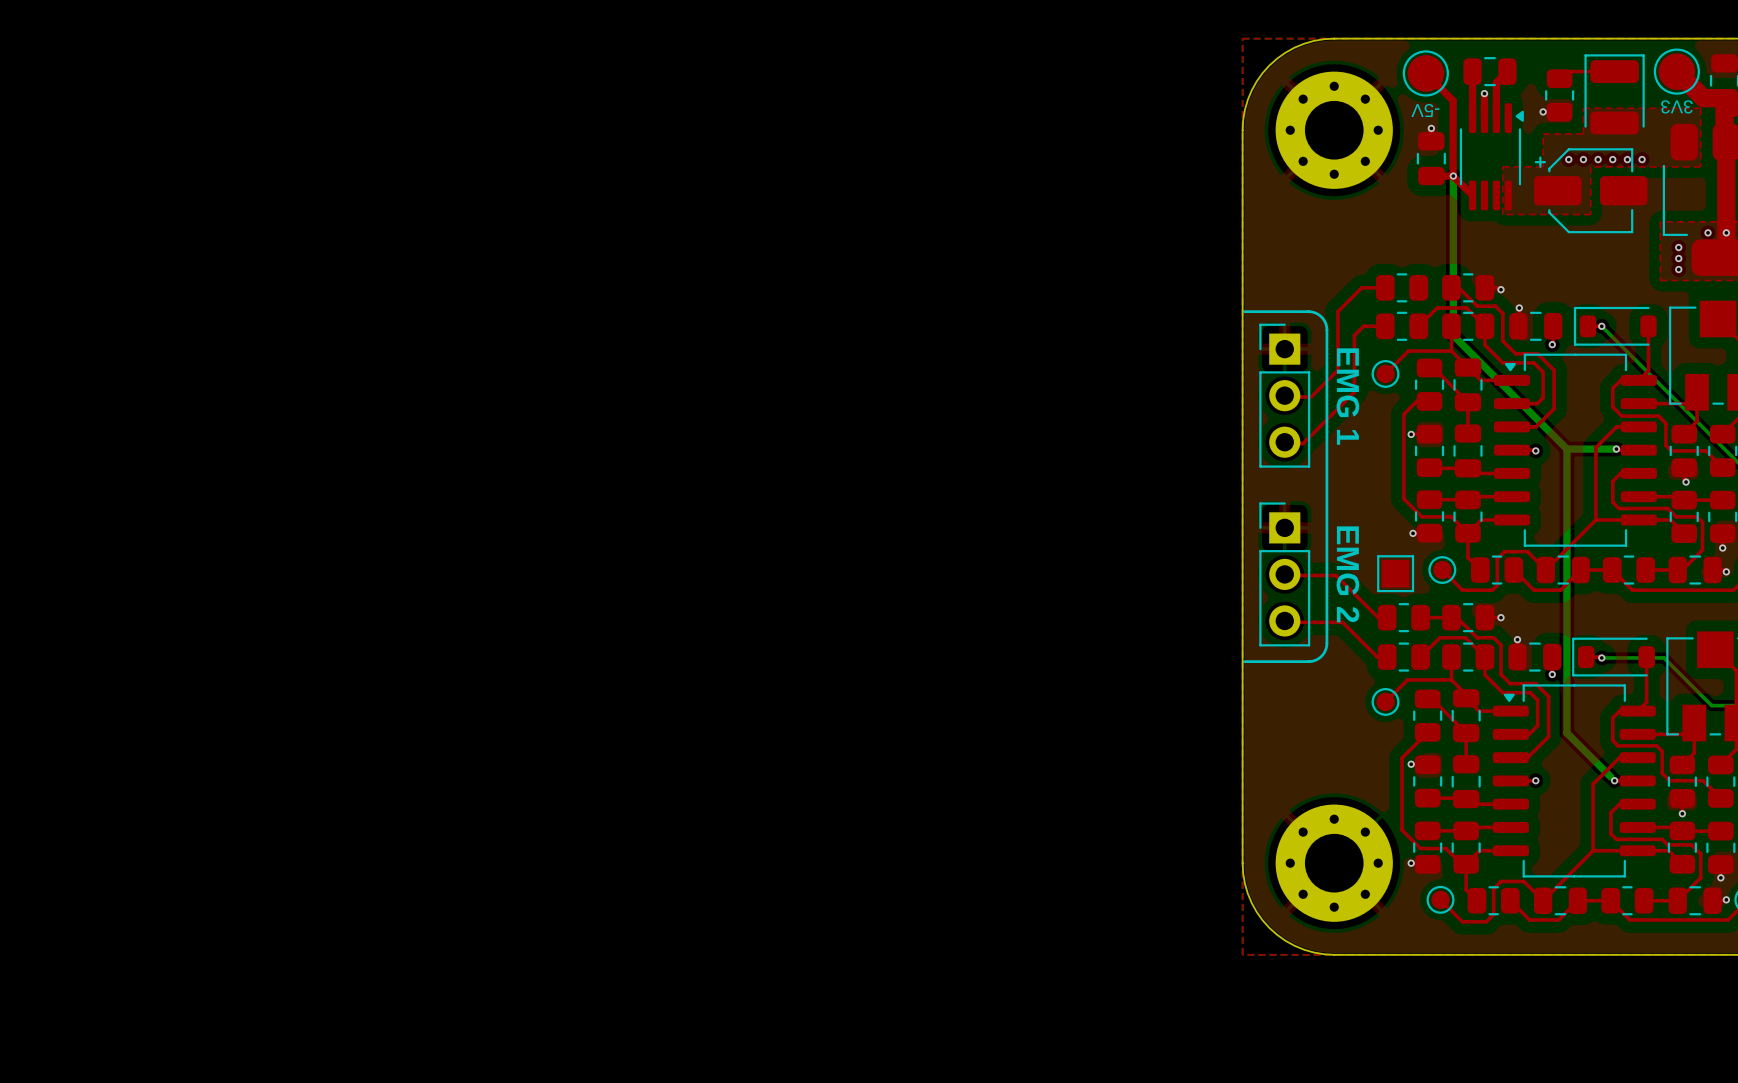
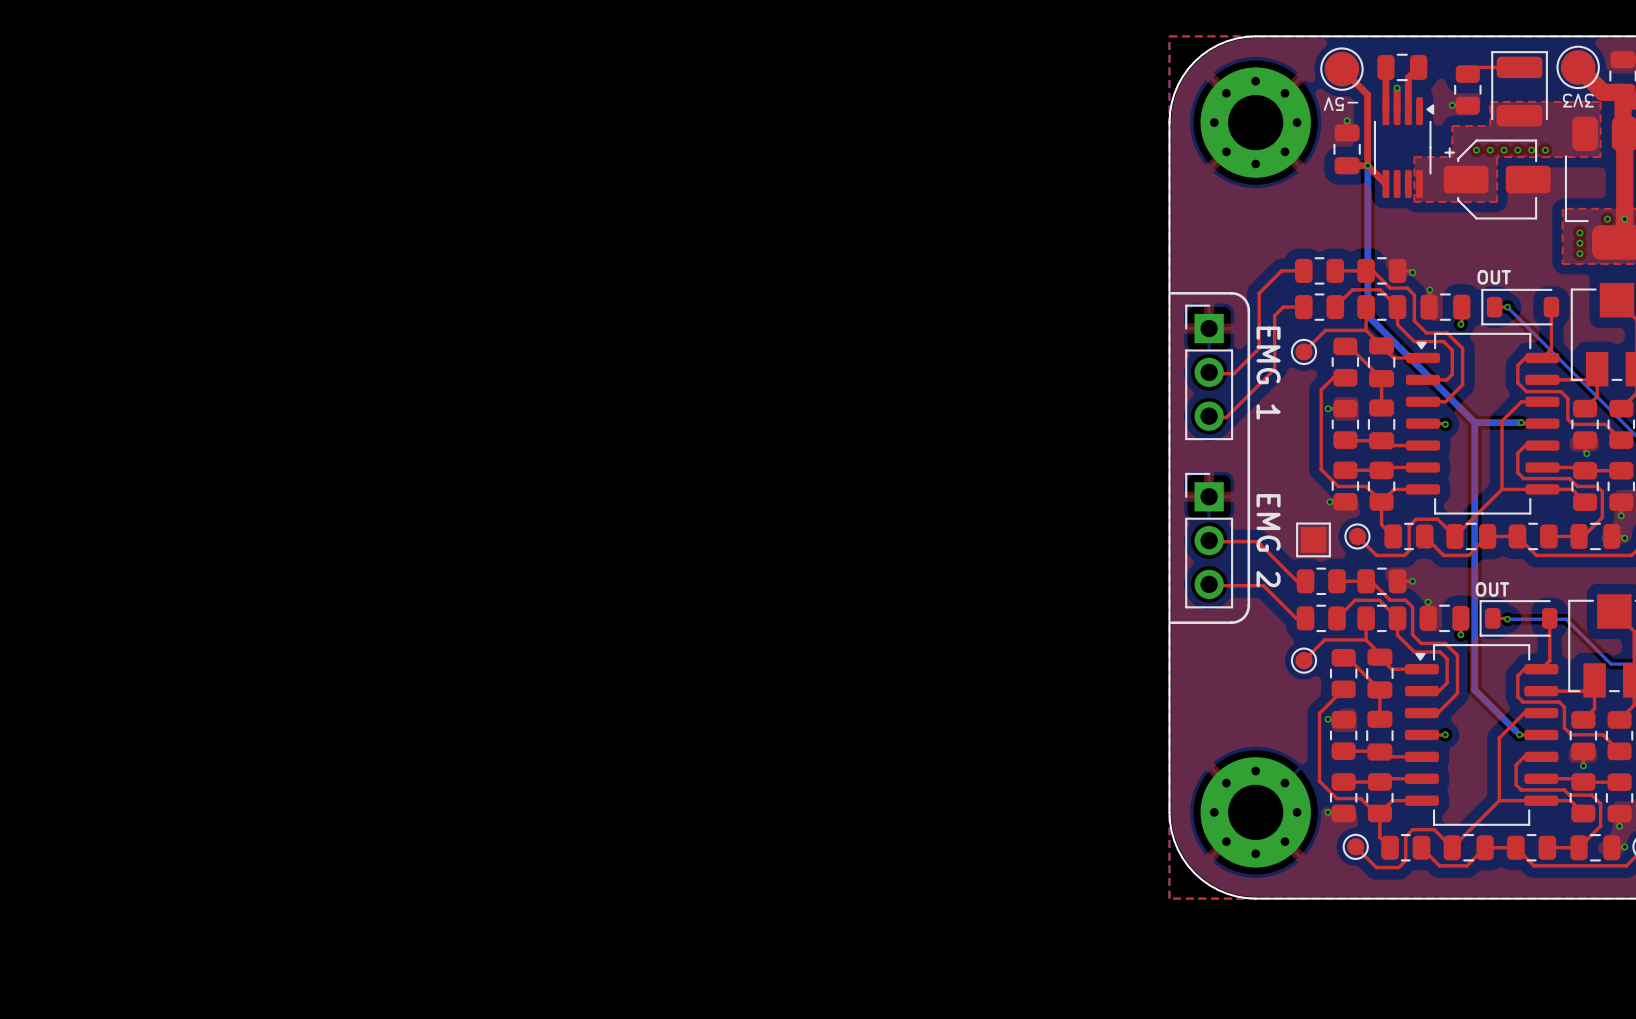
top track: none -> (1335, 270) (1366, 270)
text: none -> OUT (1494, 277)
text: none -> OUT (1492, 589)

